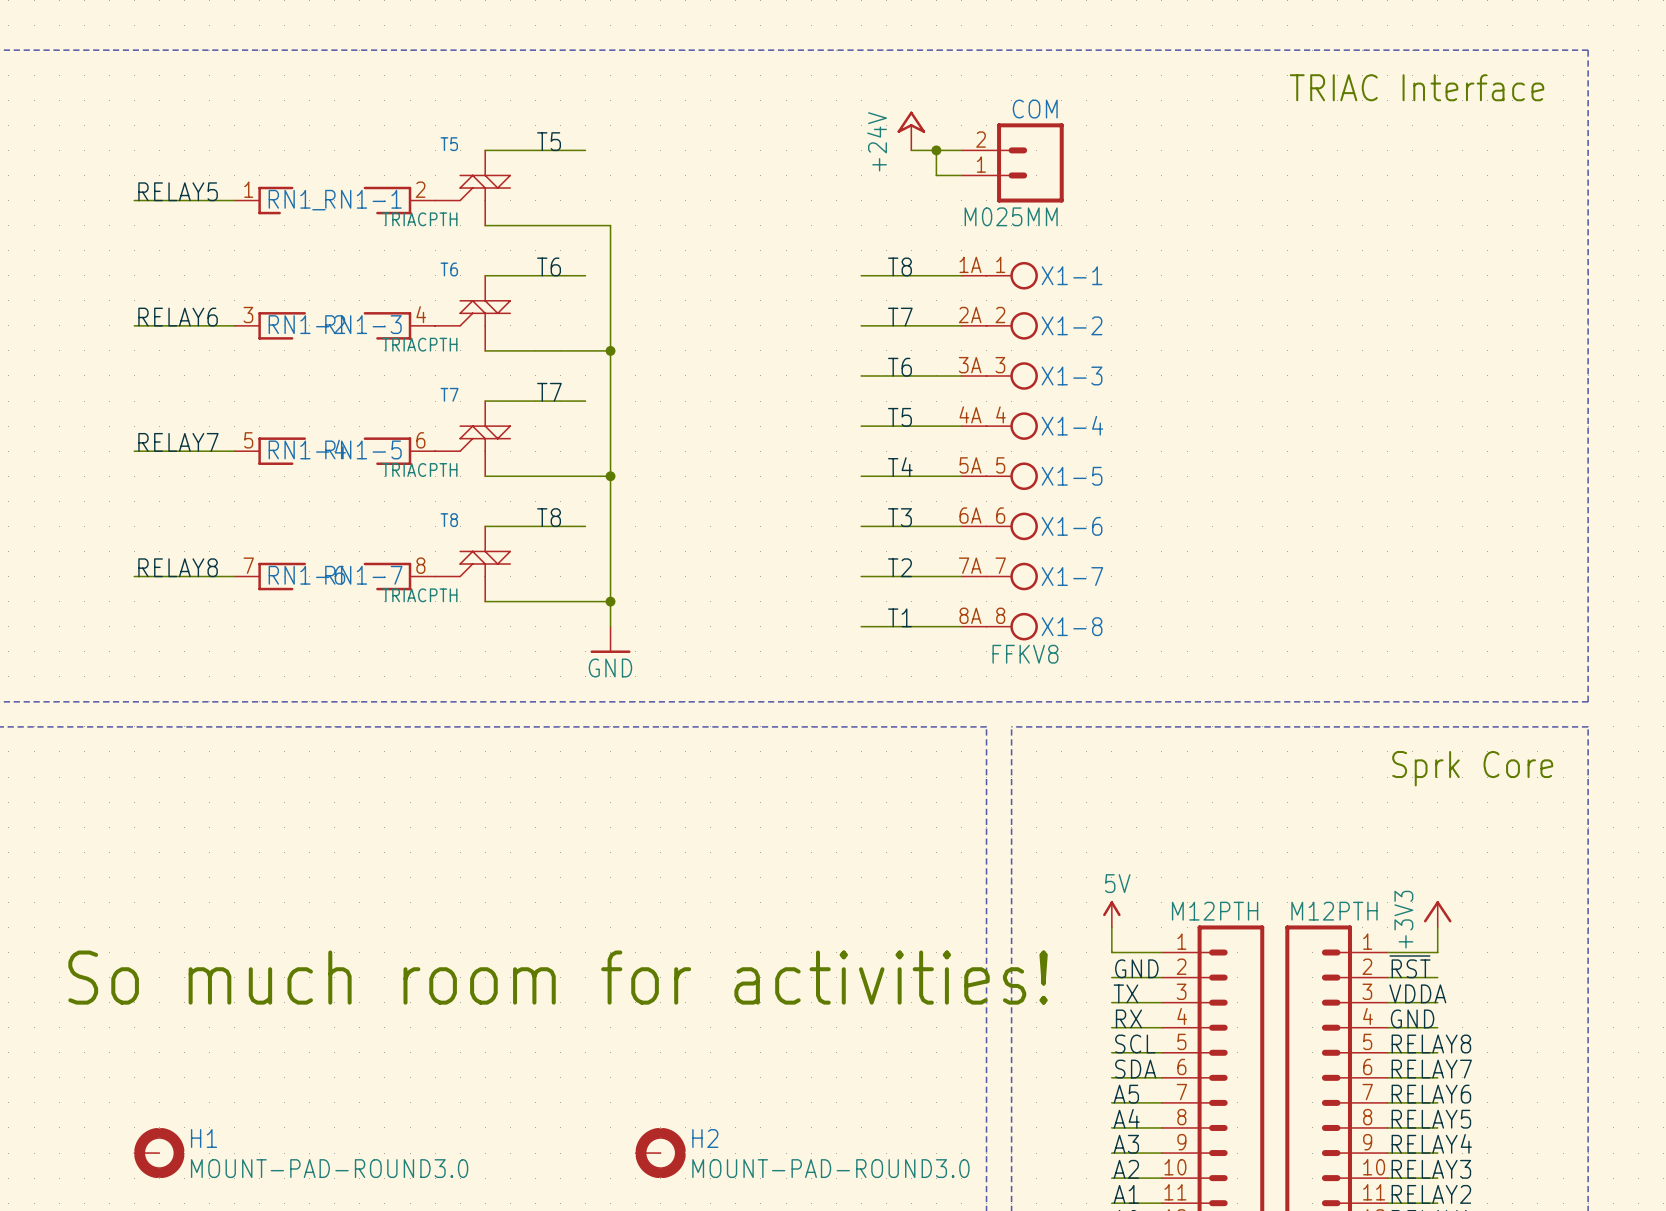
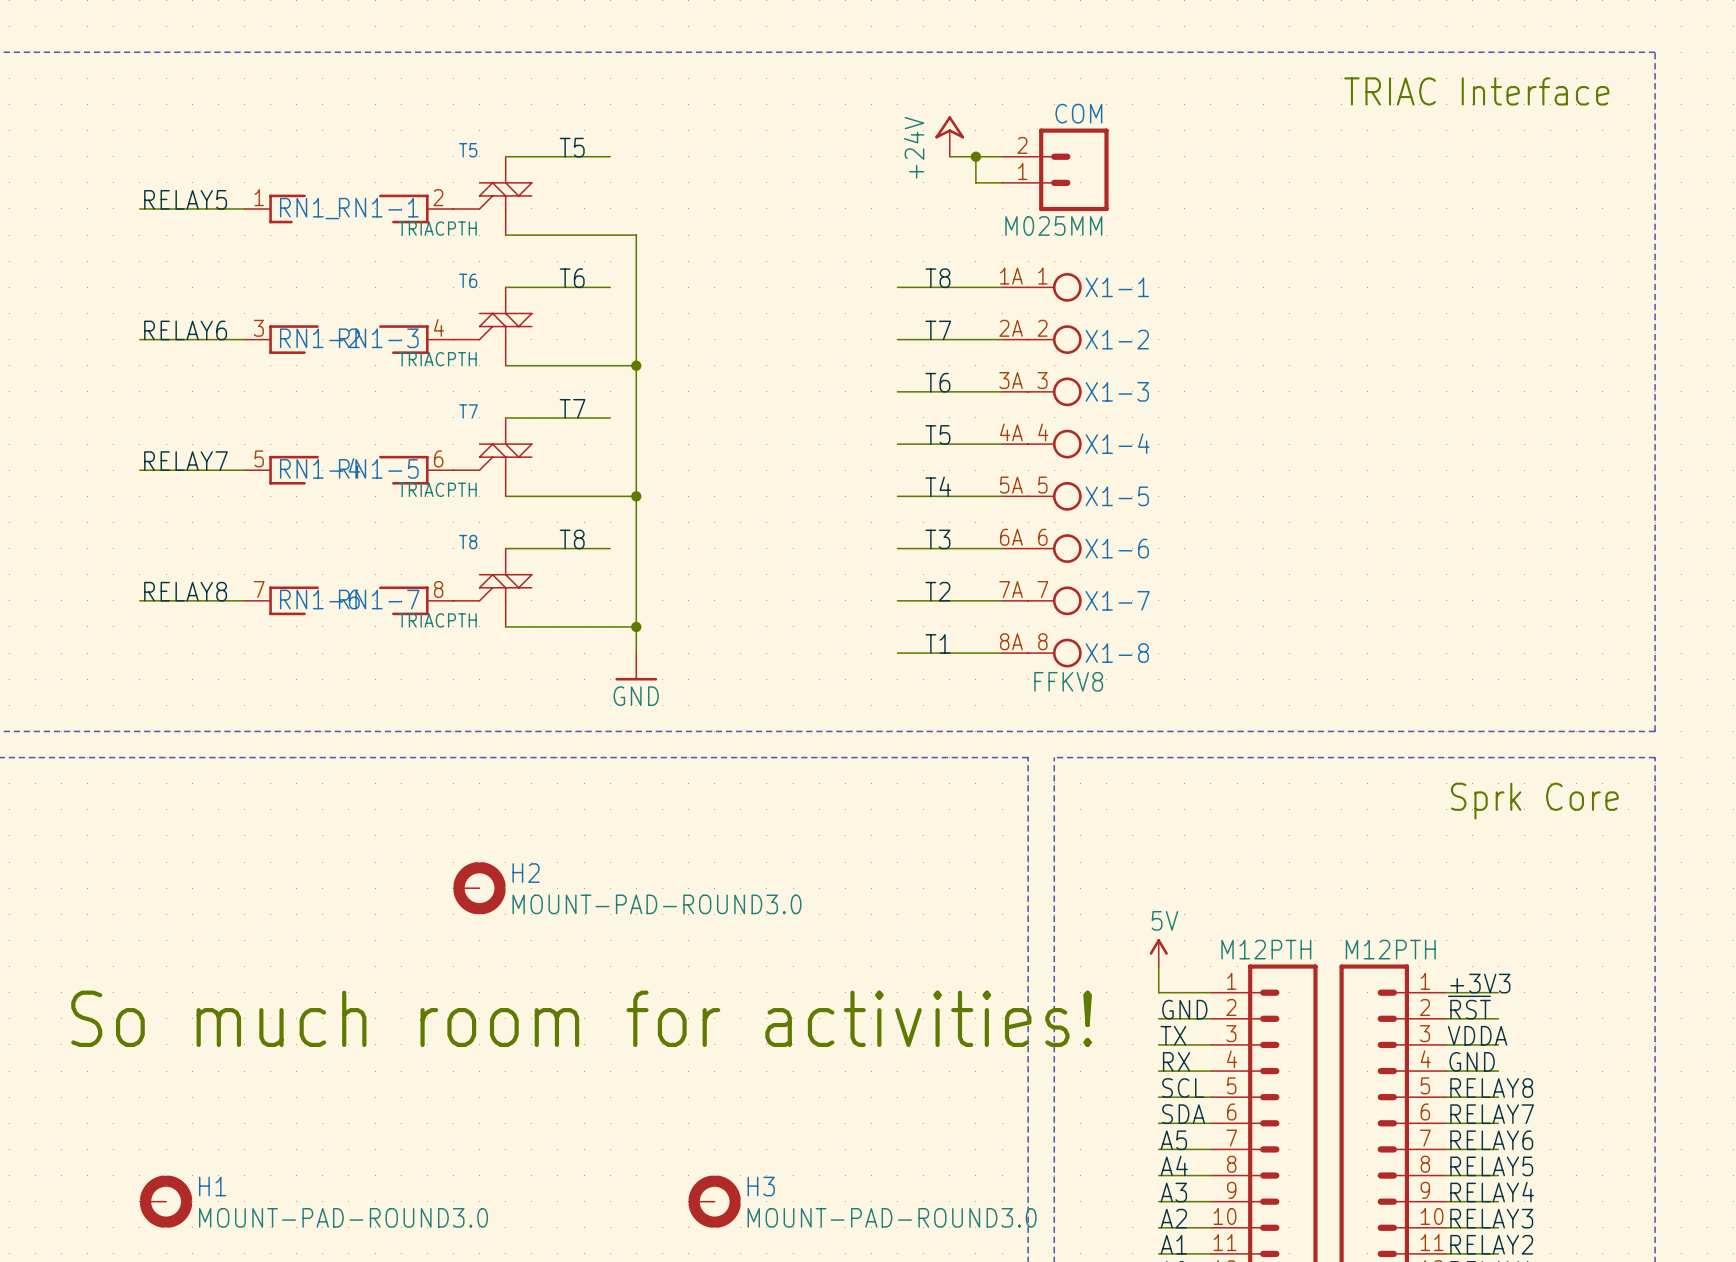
power symbol: +3V3 (1437, 914) -> none
wire: (1437, 927) (1437, 952) -> none
label: none -> +3V3 (1480, 983)
H2 position: (660, 1153) -> (479, 888)
H3: none -> MOUNT-PAD-ROUND3.0 (714, 1201)

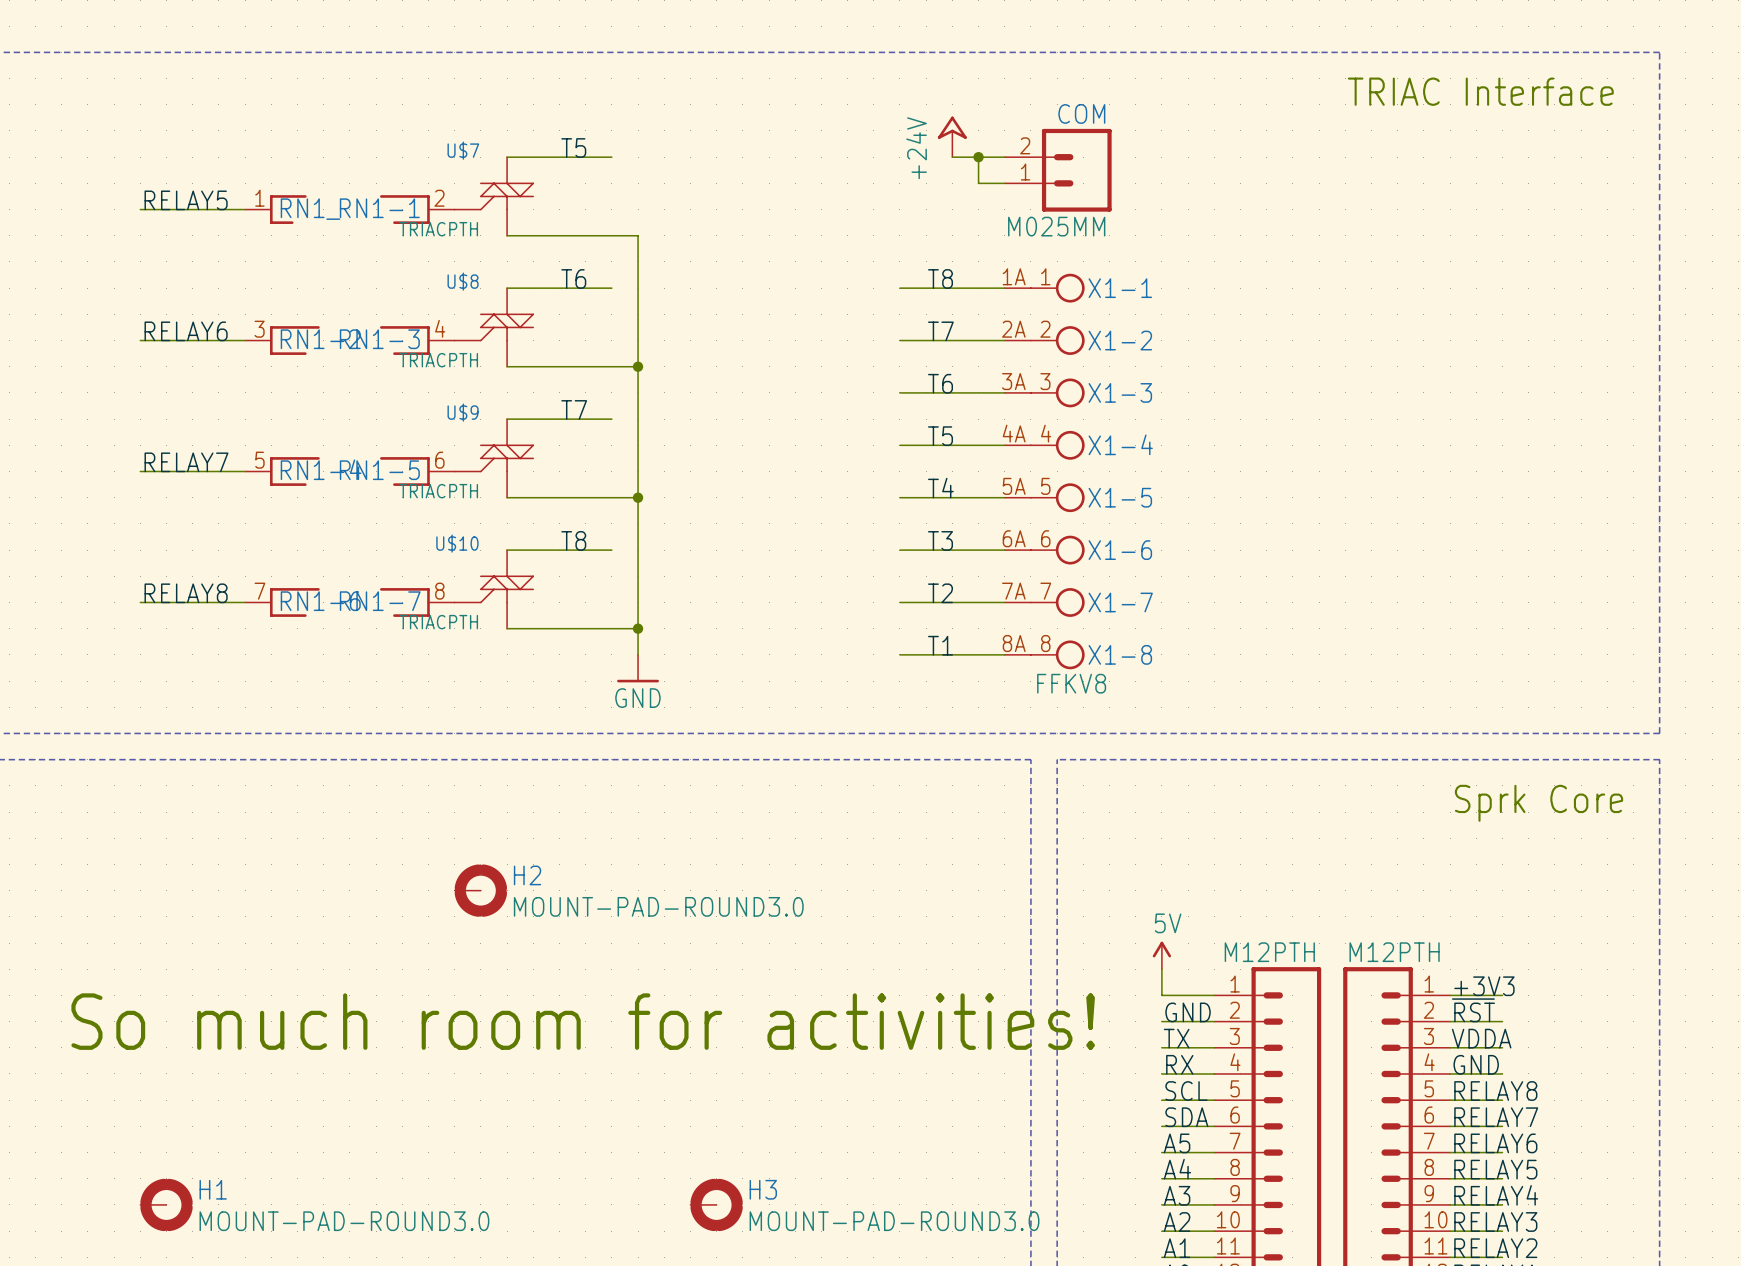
T5 name: T5 (468, 150) -> U$7 (463, 150)
T6 name: T6 (468, 280) -> U$8 (463, 281)
T7 name: T7 (468, 411) -> U$9 (463, 412)
T8 name: T8 (468, 542) -> U$10 (457, 543)

